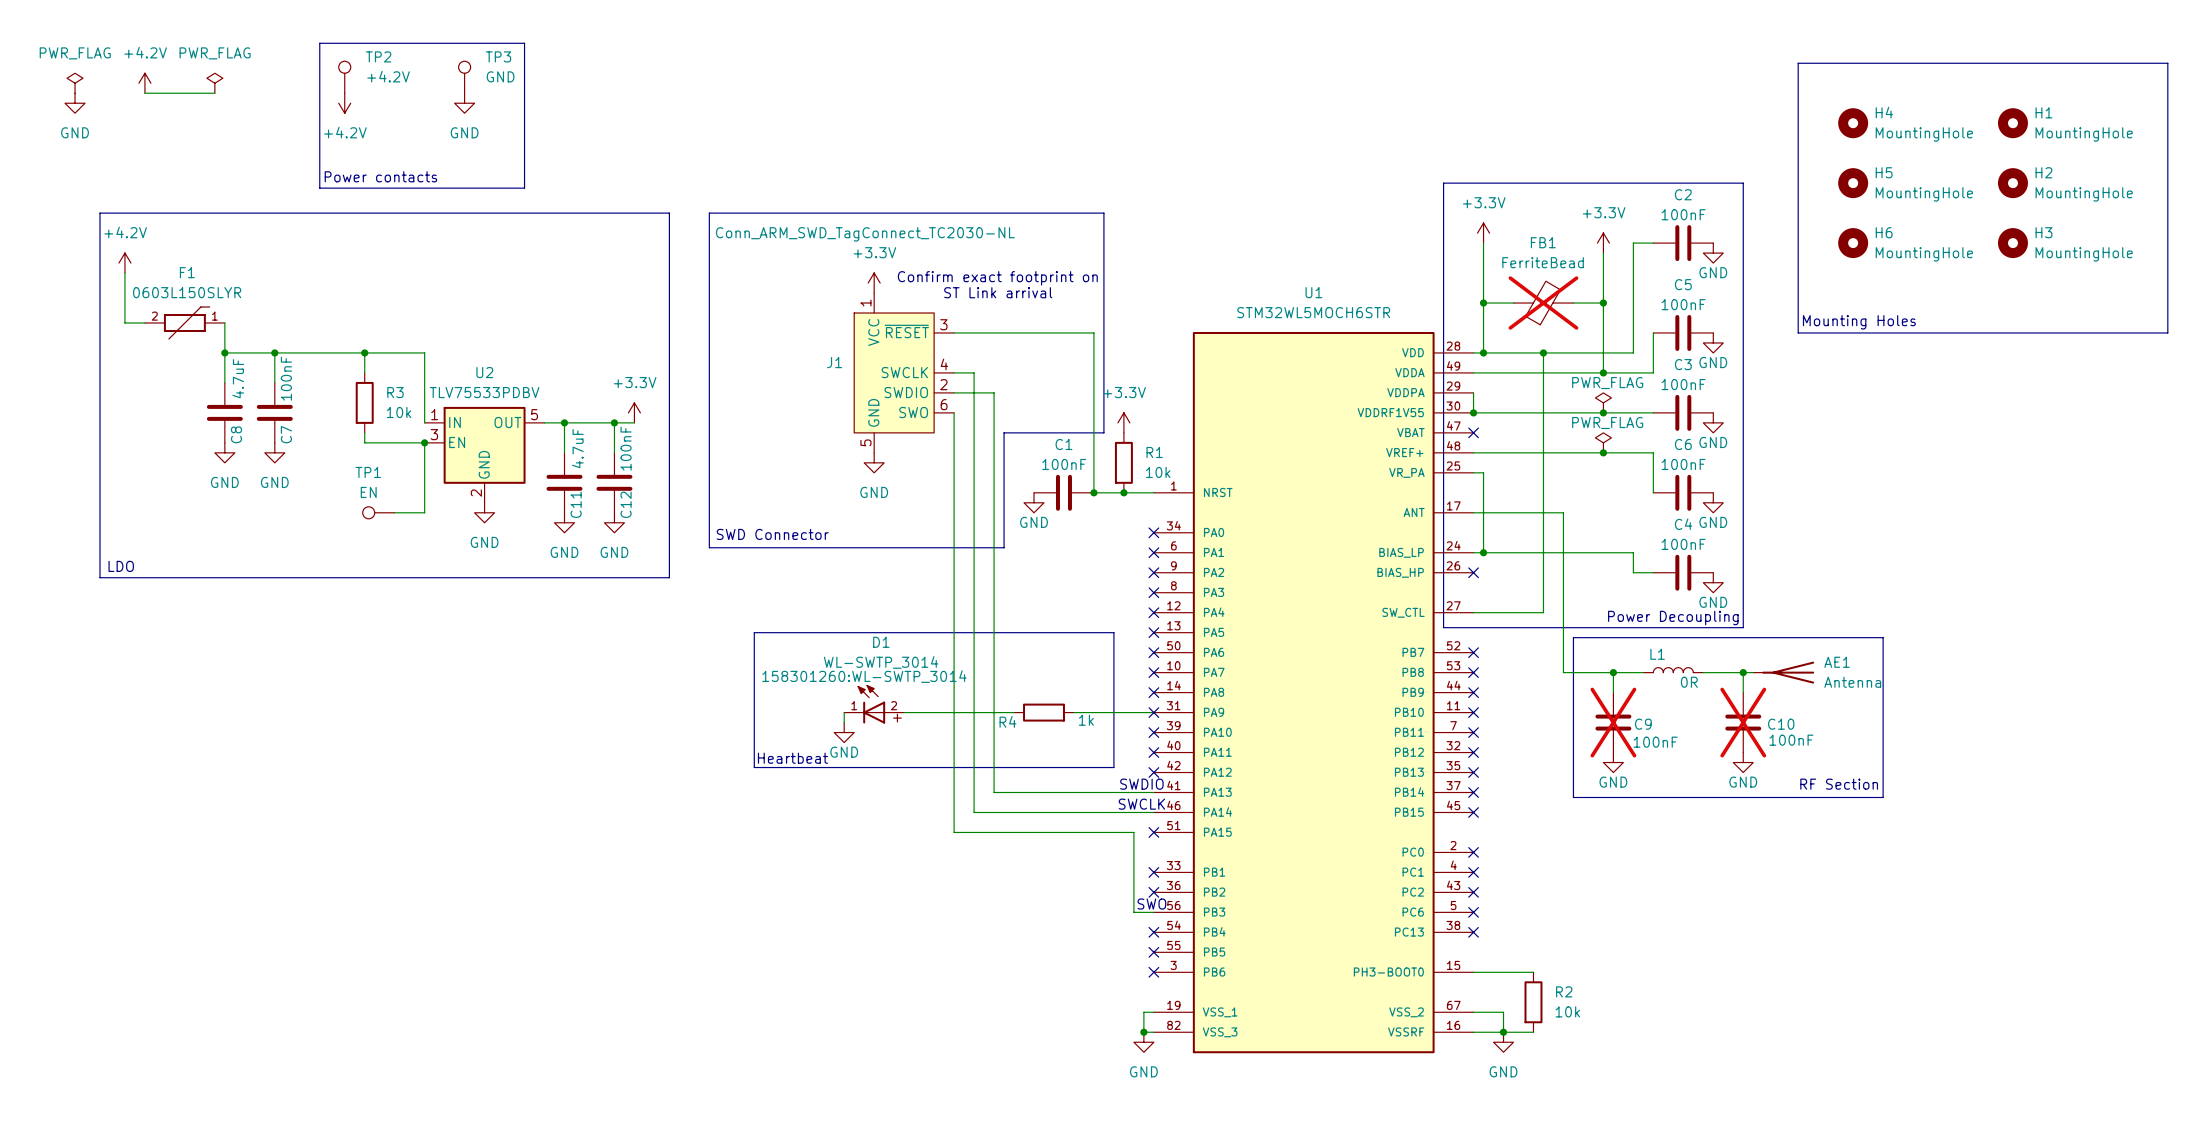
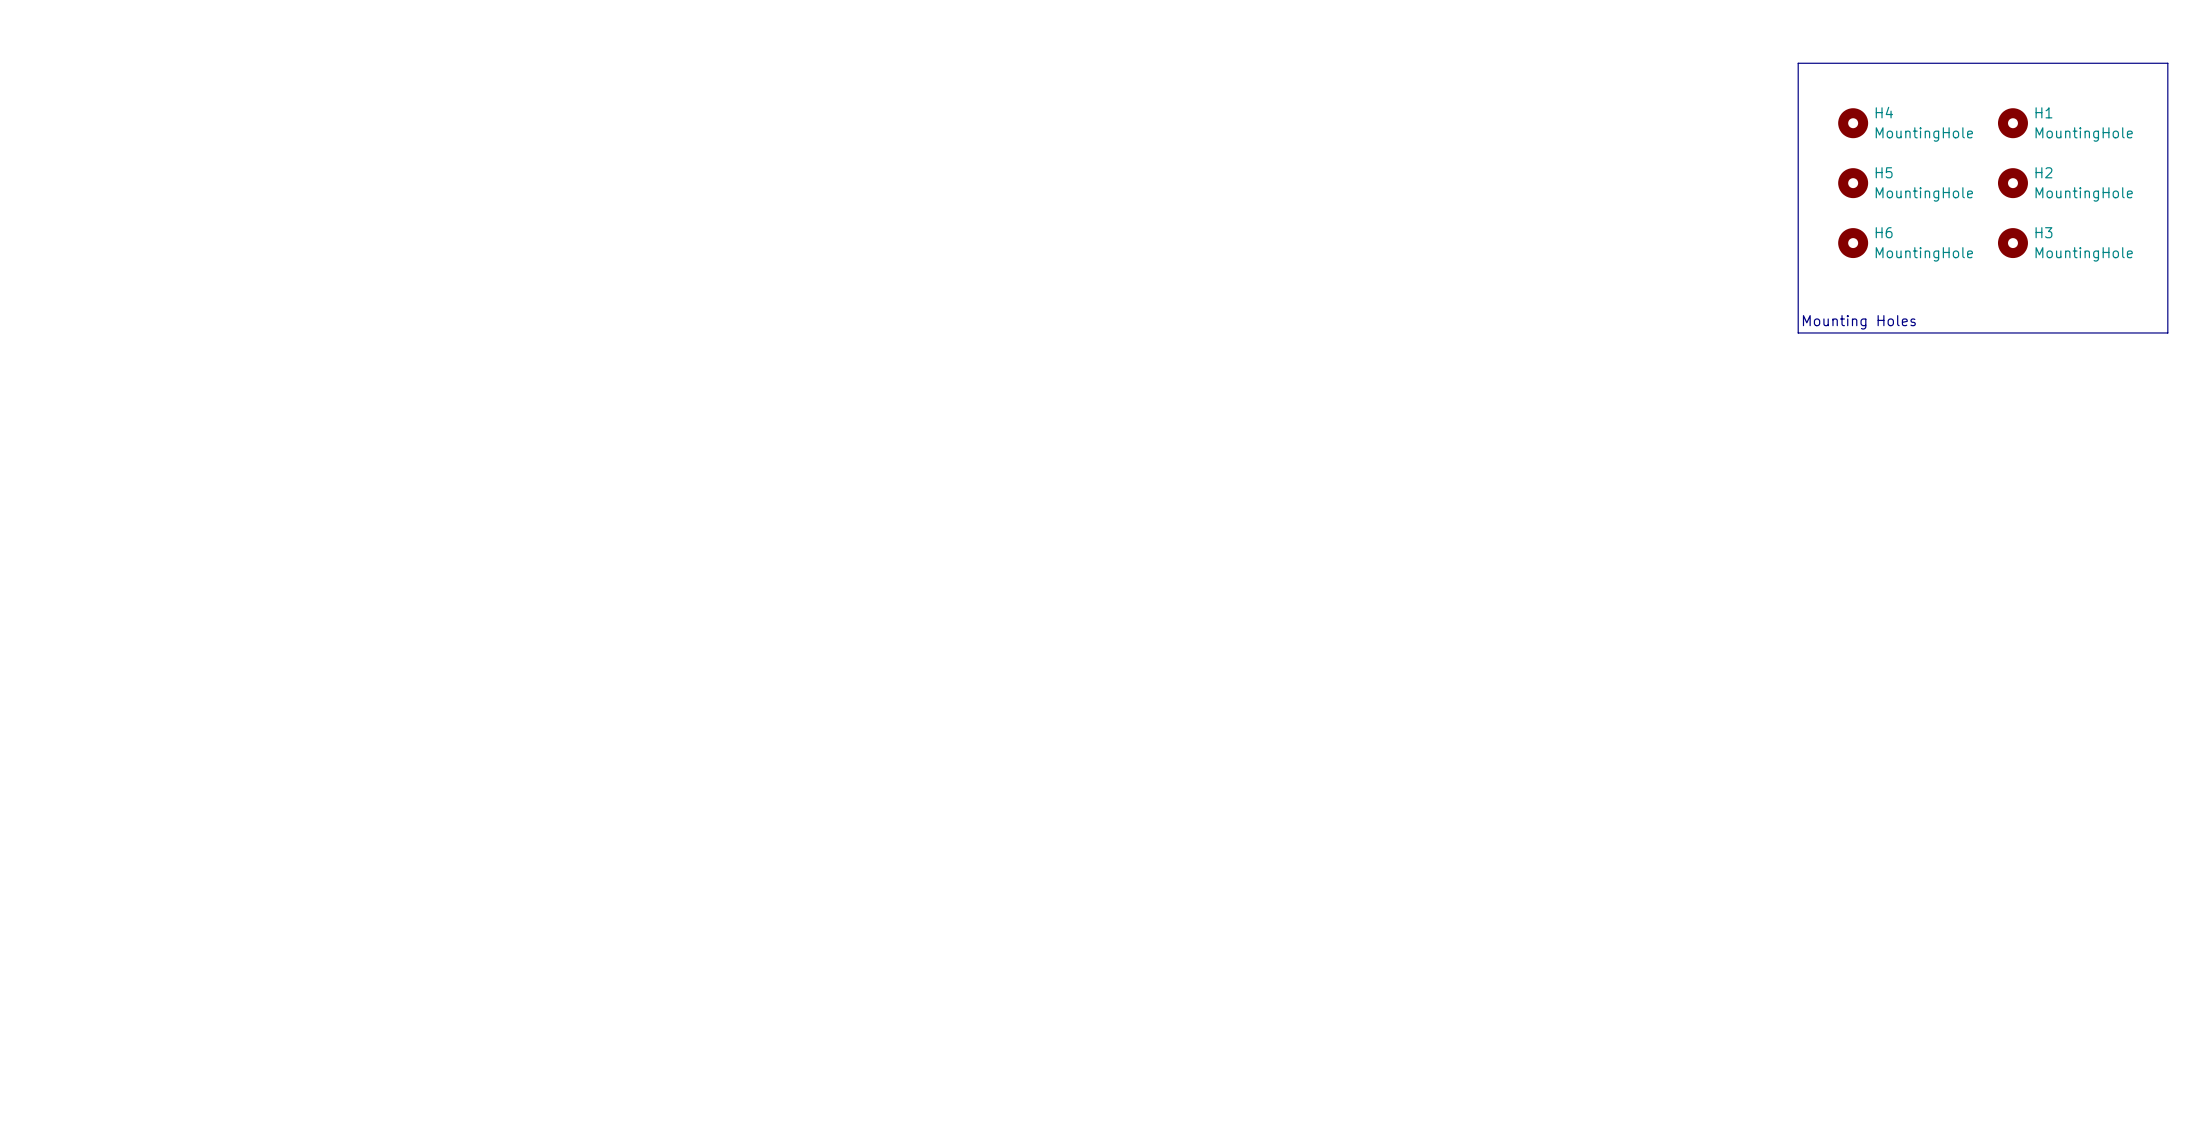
line: (319, 43) (524, 43) (524, 188) (319, 188) (319, 43) -> none
TP2: +4.2V (344, 77) -> none
TP3: GND (464, 77) -> none
power symbol: PWR_FLAG (75, 83) -> none
power symbol: +4.2V (144, 83) -> none
power symbol: PWR_FLAG (214, 83) -> none
wire: (144, 93) (214, 93) -> none
power symbol: GND (75, 103) -> none
power symbol: +4.2V (344, 103) -> none
power symbol: GND (464, 103) -> none
text: Power contacts (380, 176) -> none
line: (1443, 183) (1743, 183) (1743, 627) (1443, 627) (1443, 183) -> none
line: (99, 213) (669, 213) (669, 577) (99, 577) (99, 213) -> none
line: (709, 213) (1103, 213) (1103, 432) (1004, 432) (1004, 547) (709, 547) (709, 213) -> none
power symbol: +3.3V (1483, 233) -> none
wire: (1483, 243) (1483, 352) -> none
power symbol: +3.3V (1603, 243) -> none
wire: (1653, 243) (1633, 243) (1633, 352) (1473, 352) -> none
C2: 100nF (1683, 243) -> none
wire: (1603, 253) (1603, 372) -> none
power symbol: GND (1713, 253) -> none
power symbol: +4.2V (124, 263) -> none
wire: (124, 273) (124, 322) (144, 322) -> none
text: Confirm exact footprint on (997, 278) -> none
power symbol: +3.3V (874, 283) -> none
text: ST Link arrival (998, 292) -> none
wire: (1483, 303) (1513, 303) -> none
junction: (1483, 303) -> none
FB1: FerriteBead (1543, 303) -> none
wire: (1573, 303) (1603, 303) -> none
junction: (1603, 303) -> none
F1: 0603L150SLYR (184, 322) -> none
wire: (224, 322) (224, 382) -> none
wire: (954, 332) (1093, 332) (1093, 492) (1153, 492) -> none
wire: (1653, 332) (1653, 372) (1473, 372) -> none
C5: 100nF (1683, 332) -> none
power symbol: GND (1713, 342) -> none
wire: (224, 352) (424, 352) (424, 422) -> none
junction: (224, 352) -> none
wire: (274, 352) (274, 382) -> none
junction: (274, 352) -> none
wire: (364, 352) (364, 372) -> none
junction: (364, 352) -> none
junction: (1483, 352) -> none
wire: (1543, 352) (1543, 612) (1473, 612) -> none
junction: (1543, 352) -> none
J1: Conn_ARM_SWD_TagConnect_TC2030-NL (904, 372) -> none
wire: (954, 372) (974, 372) (974, 812) (1153, 812) -> none
junction: (1603, 372) -> none
wire: (954, 392) (994, 392) (994, 792) (1153, 792) -> none
wire: (1473, 392) (1473, 412) (1653, 412) -> none
R3: 10k (364, 402) -> none
power symbol: PWR_FLAG (1603, 402) -> none
C8: 4.7uF (224, 412) -> none
C7: 100nF (274, 412) -> none
power symbol: +3.3V (634, 412) -> none
wire: (954, 412) (954, 832) (1133, 832) (1133, 912) (1153, 912) -> none
junction: (1473, 412) -> none
junction: (1603, 412) -> none
C3: 100nF (1683, 412) -> none
wire: (544, 422) (634, 422) -> none
wire: (564, 422) (564, 452) -> none
junction: (564, 422) -> none
wire: (614, 422) (614, 452) -> none
junction: (614, 422) -> none
power symbol: +3.3V (1123, 422) -> none
power symbol: GND (1713, 422) -> none
wire: (364, 432) (364, 442) (424, 442) (424, 512) (394, 512) -> none
no-connect mark: (1473, 432) -> none
junction: (424, 442) -> none
power symbol: PWR_FLAG (1603, 442) -> none
power symbol: GND (224, 452) -> none
power symbol: GND (274, 452) -> none
wire: (1473, 452) (1653, 452) (1653, 492) -> none
junction: (1603, 452) -> none
U2: TLV75533PDBV (484, 454) -> none
power symbol: GND (874, 462) -> none
R1: 10k (1123, 462) -> none
wire: (1473, 472) (1483, 472) (1483, 552) -> none
C11: 4.7uF (564, 482) -> none
C12: 100nF (614, 482) -> none
C1: 100nF (1063, 492) -> none
junction: (1093, 492) -> none
junction: (1123, 492) -> none
C6: 100nF (1683, 492) -> none
power symbol: GND (1034, 502) -> none
power symbol: GND (1713, 502) -> none
TP1: EN (378, 512) -> none
power symbol: GND (484, 512) -> none
wire: (1473, 512) (1563, 512) (1563, 672) (1643, 672) -> none
power symbol: GND (564, 522) -> none
power symbol: GND (614, 522) -> none
no-connect mark: (1153, 532) -> none
text: SWD Connector (772, 534) -> none
no-connect mark: (1153, 552) -> none
wire: (1473, 552) (1633, 552) (1633, 572) (1653, 572) -> none
junction: (1483, 552) -> none
text: LDO (121, 566) -> none
no-connect mark: (1153, 572) -> none
no-connect mark: (1473, 572) -> none
C4: 100nF (1683, 572) -> none
power symbol: GND (1713, 582) -> none
no-connect mark: (1153, 592) -> none
no-connect mark: (1153, 612) -> none
text: Power Decoupling (1673, 618) -> none
line: (754, 632) (1113, 632) (1113, 767) (754, 767) (754, 632) -> none
no-connect mark: (1153, 632) -> none
line: (1573, 637) (1883, 637) (1883, 797) (1573, 797) (1573, 637) -> none
no-connect mark: (1153, 652) -> none
no-connect mark: (1473, 652) -> none
L1: 0R (1673, 670) -> none
no-connect mark: (1153, 672) -> none
no-connect mark: (1473, 672) -> none
wire: (1613, 672) (1613, 692) -> none
junction: (1613, 672) -> none
wire: (1703, 672) (1753, 672) -> none
wire: (1743, 672) (1743, 692) -> none
junction: (1743, 672) -> none
AE1: Antenna (1783, 672) -> none
no-connect mark: (1153, 692) -> none
U1: STM32WL5MOCH6STR (1313, 692) -> none
no-connect mark: (1473, 692) -> none
D1: WL-SWTP_3014 (874, 704) -> none
wire: (844, 712) (844, 722) -> none
wire: (904, 712) (1014, 712) -> none
R4: 1k (1044, 712) -> none
wire: (1073, 712) (1153, 712) -> none
no-connect mark: (1153, 712) -> none
no-connect mark: (1473, 712) -> none
C9: 100nF (1613, 722) -> none
C10: 100nF (1743, 722) -> none
power symbol: GND (844, 732) -> none
no-connect mark: (1153, 732) -> none
no-connect mark: (1473, 732) -> none
no-connect mark: (1153, 752) -> none
no-connect mark: (1473, 752) -> none
text: Heartbeat (792, 758) -> none
power symbol: GND (1613, 762) -> none
power symbol: GND (1743, 762) -> none
no-connect mark: (1153, 772) -> none
no-connect mark: (1473, 772) -> none
text: SWDIO (1141, 784) -> none
text: RF Section (1839, 784) -> none
no-connect mark: (1473, 792) -> none
text: SWCLK (1141, 804) -> none
no-connect mark: (1473, 812) -> none
no-connect mark: (1153, 832) -> none
no-connect mark: (1473, 852) -> none
no-connect mark: (1153, 872) -> none
no-connect mark: (1473, 872) -> none
no-connect mark: (1153, 892) -> none
no-connect mark: (1473, 892) -> none
text: SWO (1151, 904) -> none
no-connect mark: (1473, 912) -> none
no-connect mark: (1153, 932) -> none
no-connect mark: (1473, 932) -> none
no-connect mark: (1153, 952) -> none
no-connect mark: (1153, 972) -> none
wire: (1473, 972) (1533, 972) -> none
R2: 10k (1533, 1002) -> none
wire: (1153, 1012) (1143, 1012) (1143, 1032) (1153, 1032) -> none
wire: (1473, 1012) (1503, 1012) (1503, 1032) -> none
junction: (1143, 1032) -> none
wire: (1473, 1032) (1533, 1032) -> none
junction: (1503, 1032) -> none
power symbol: GND (1143, 1042) -> none
power symbol: GND (1503, 1042) -> none

